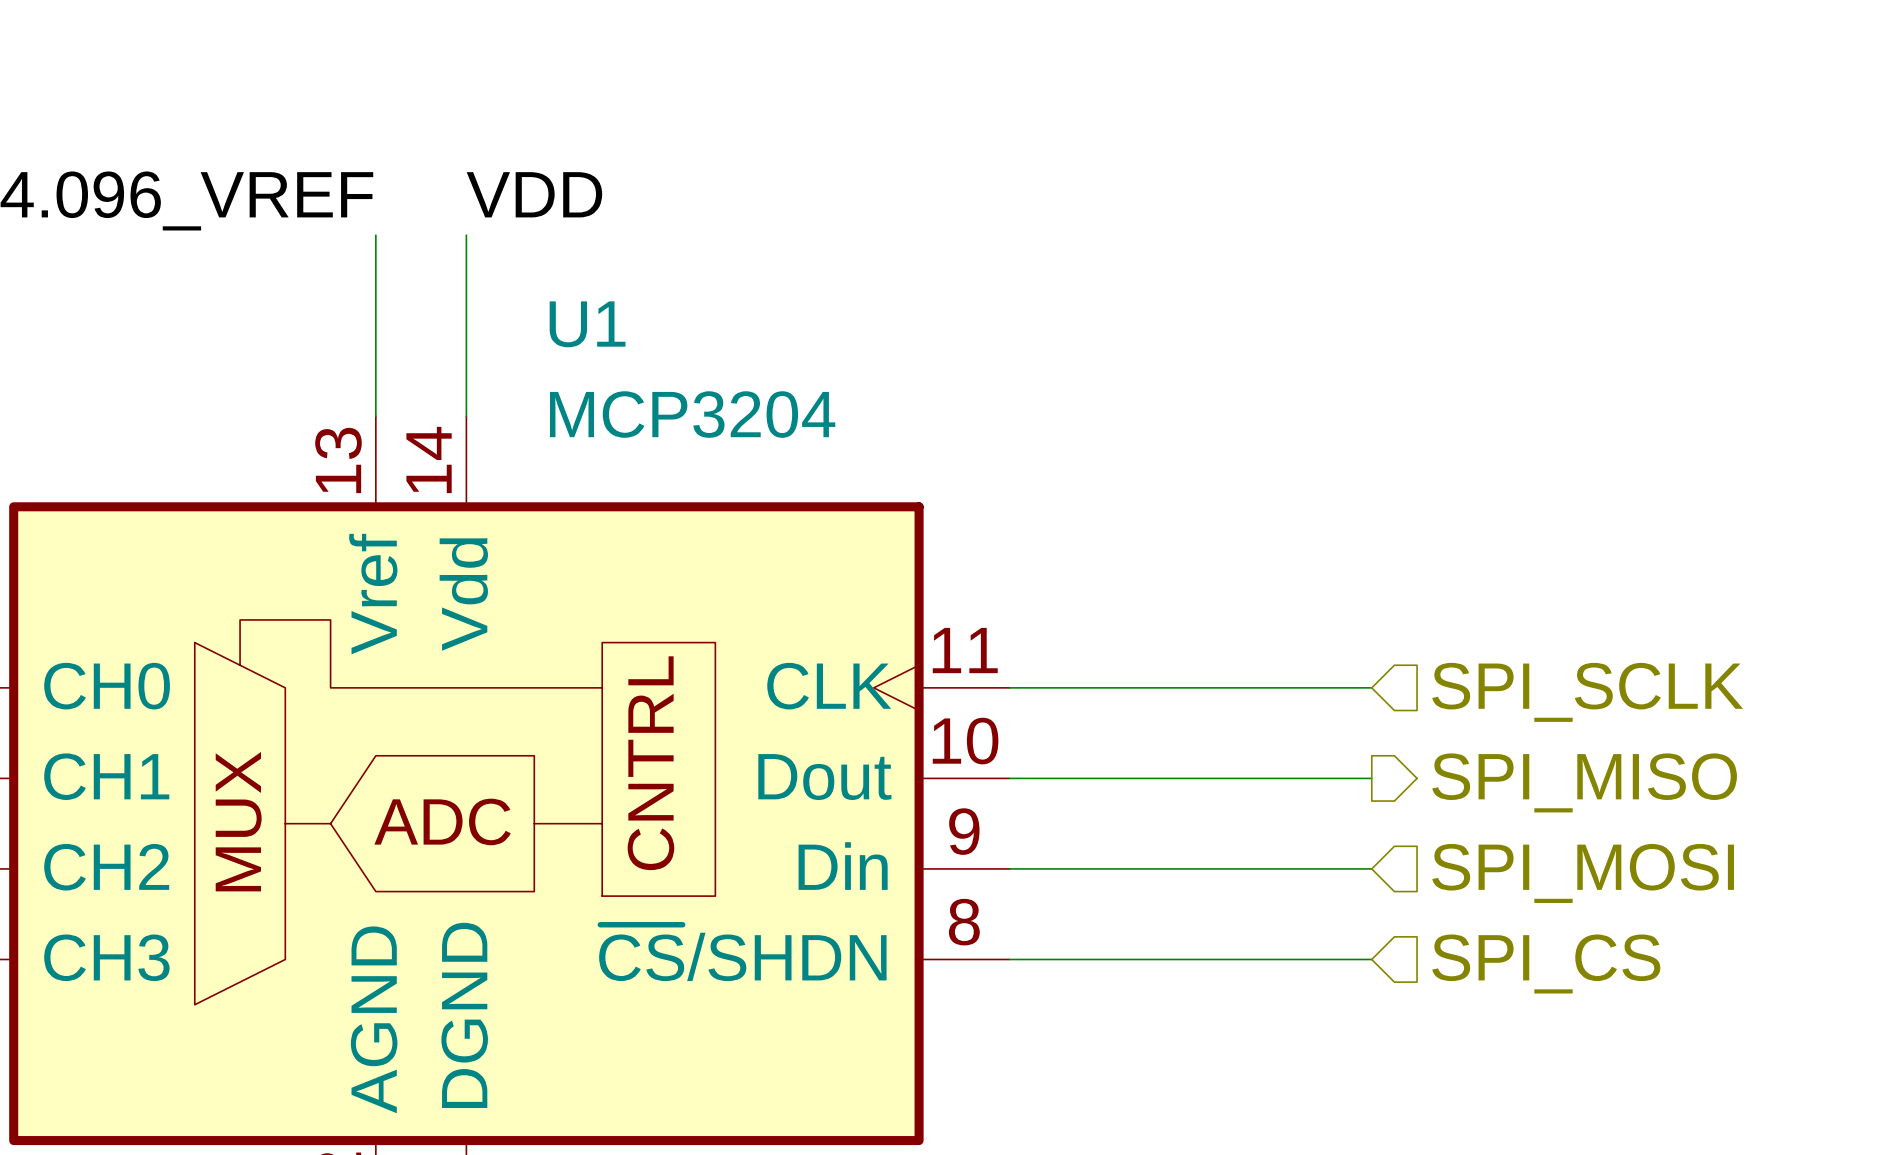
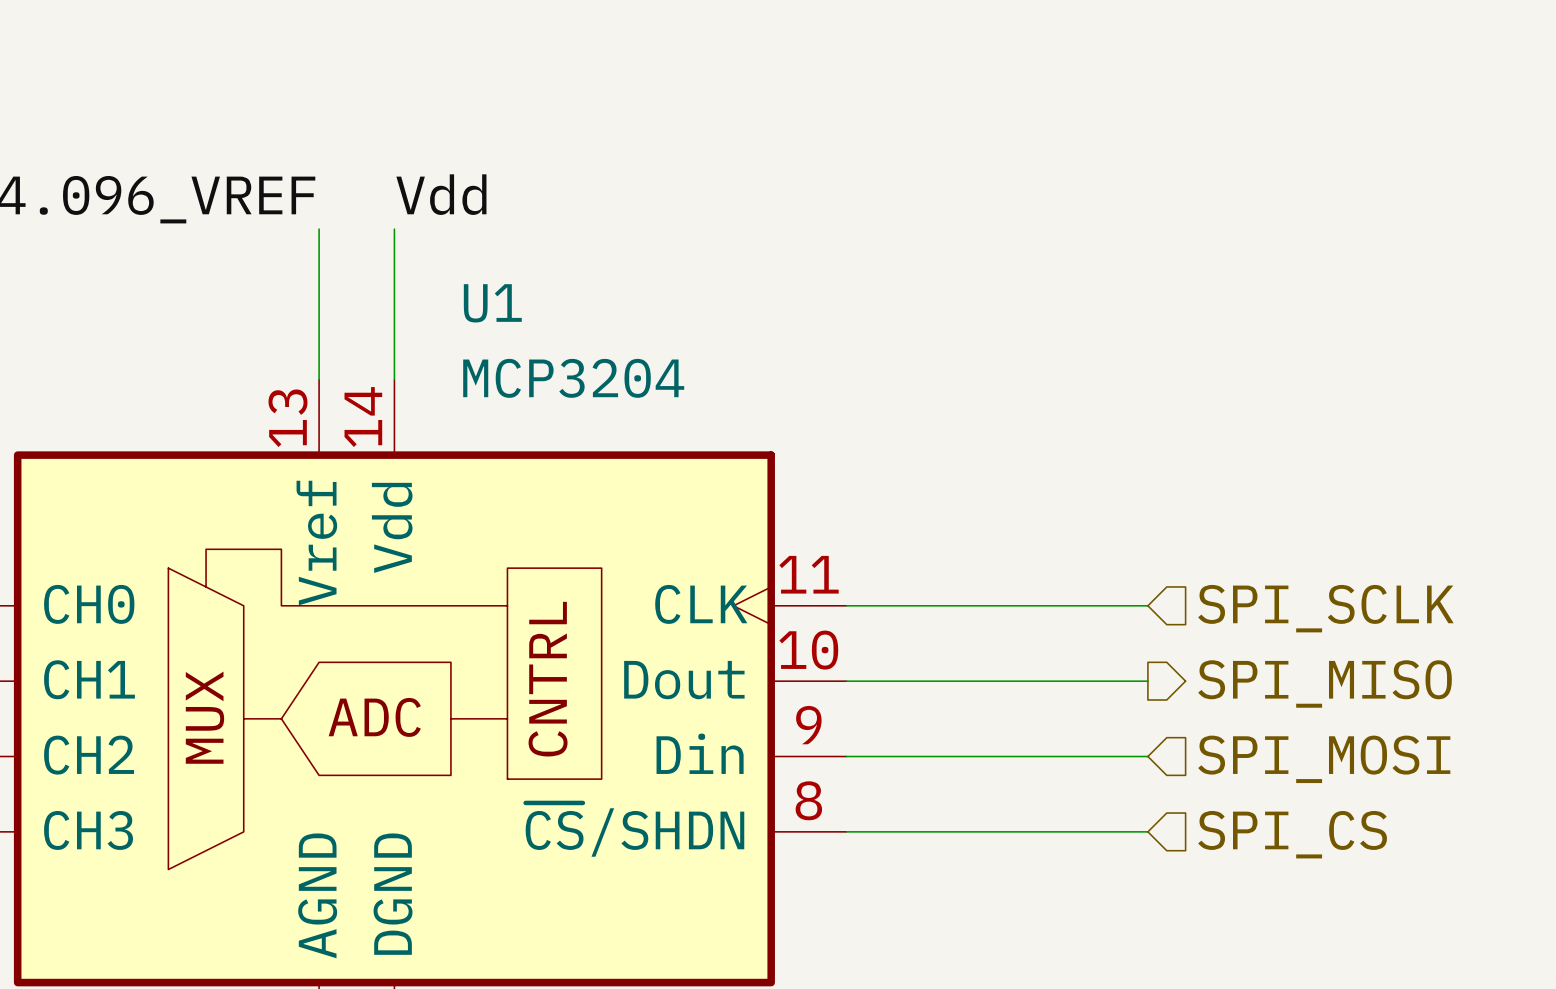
label: VDD (534, 194) -> Vdd (441, 194)

